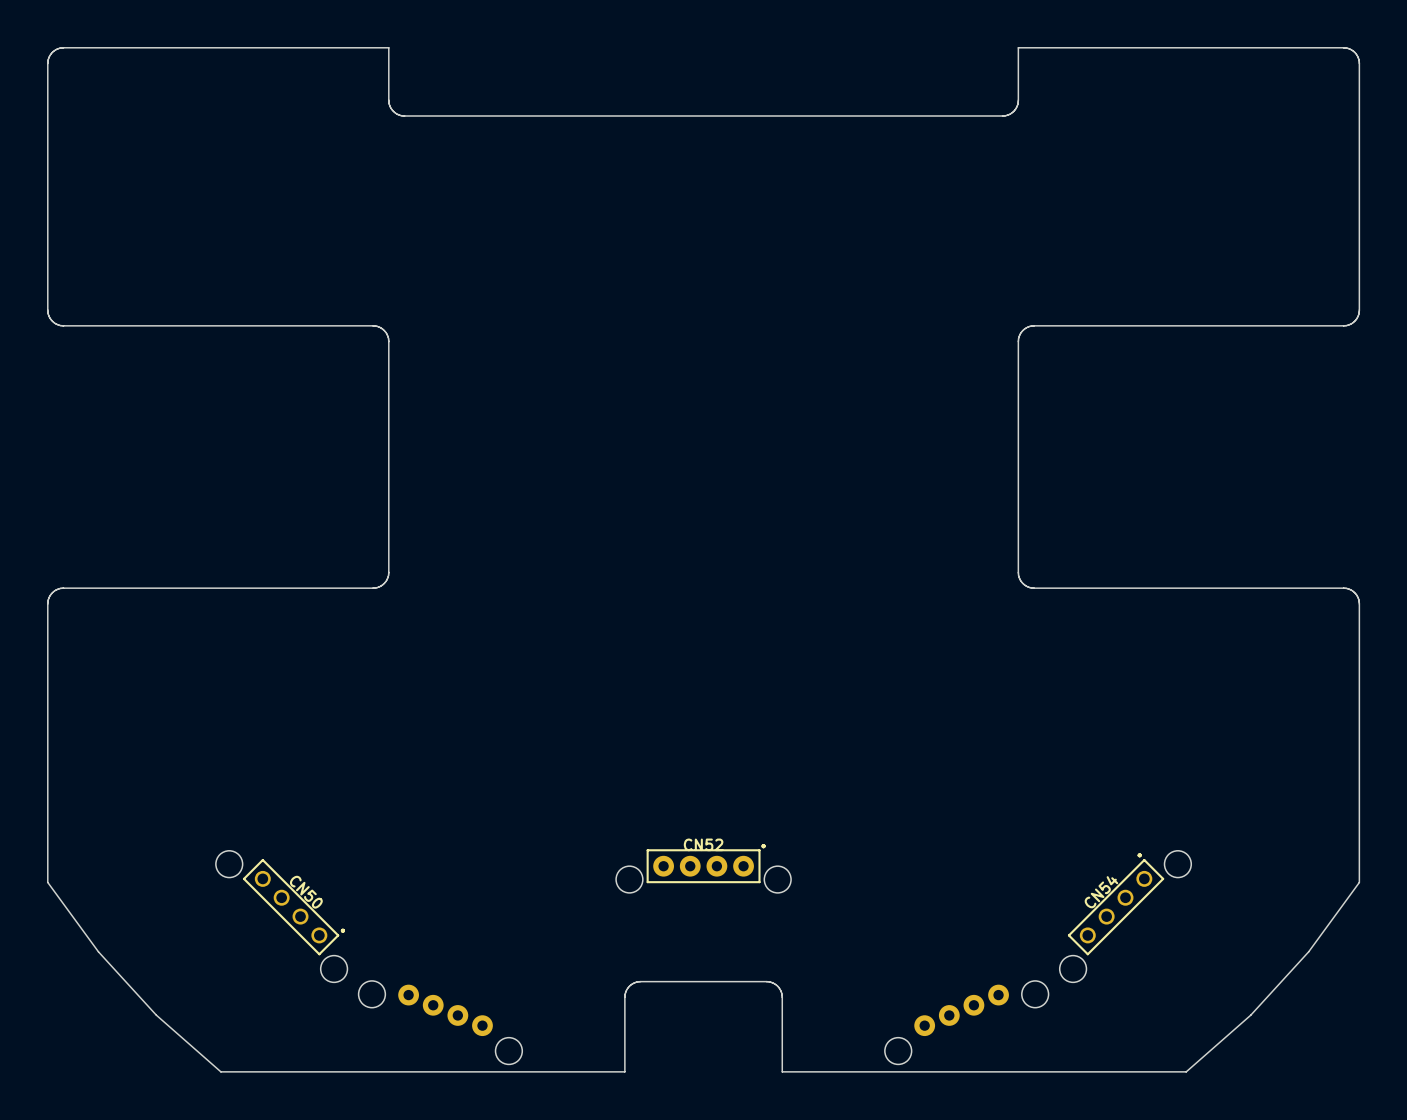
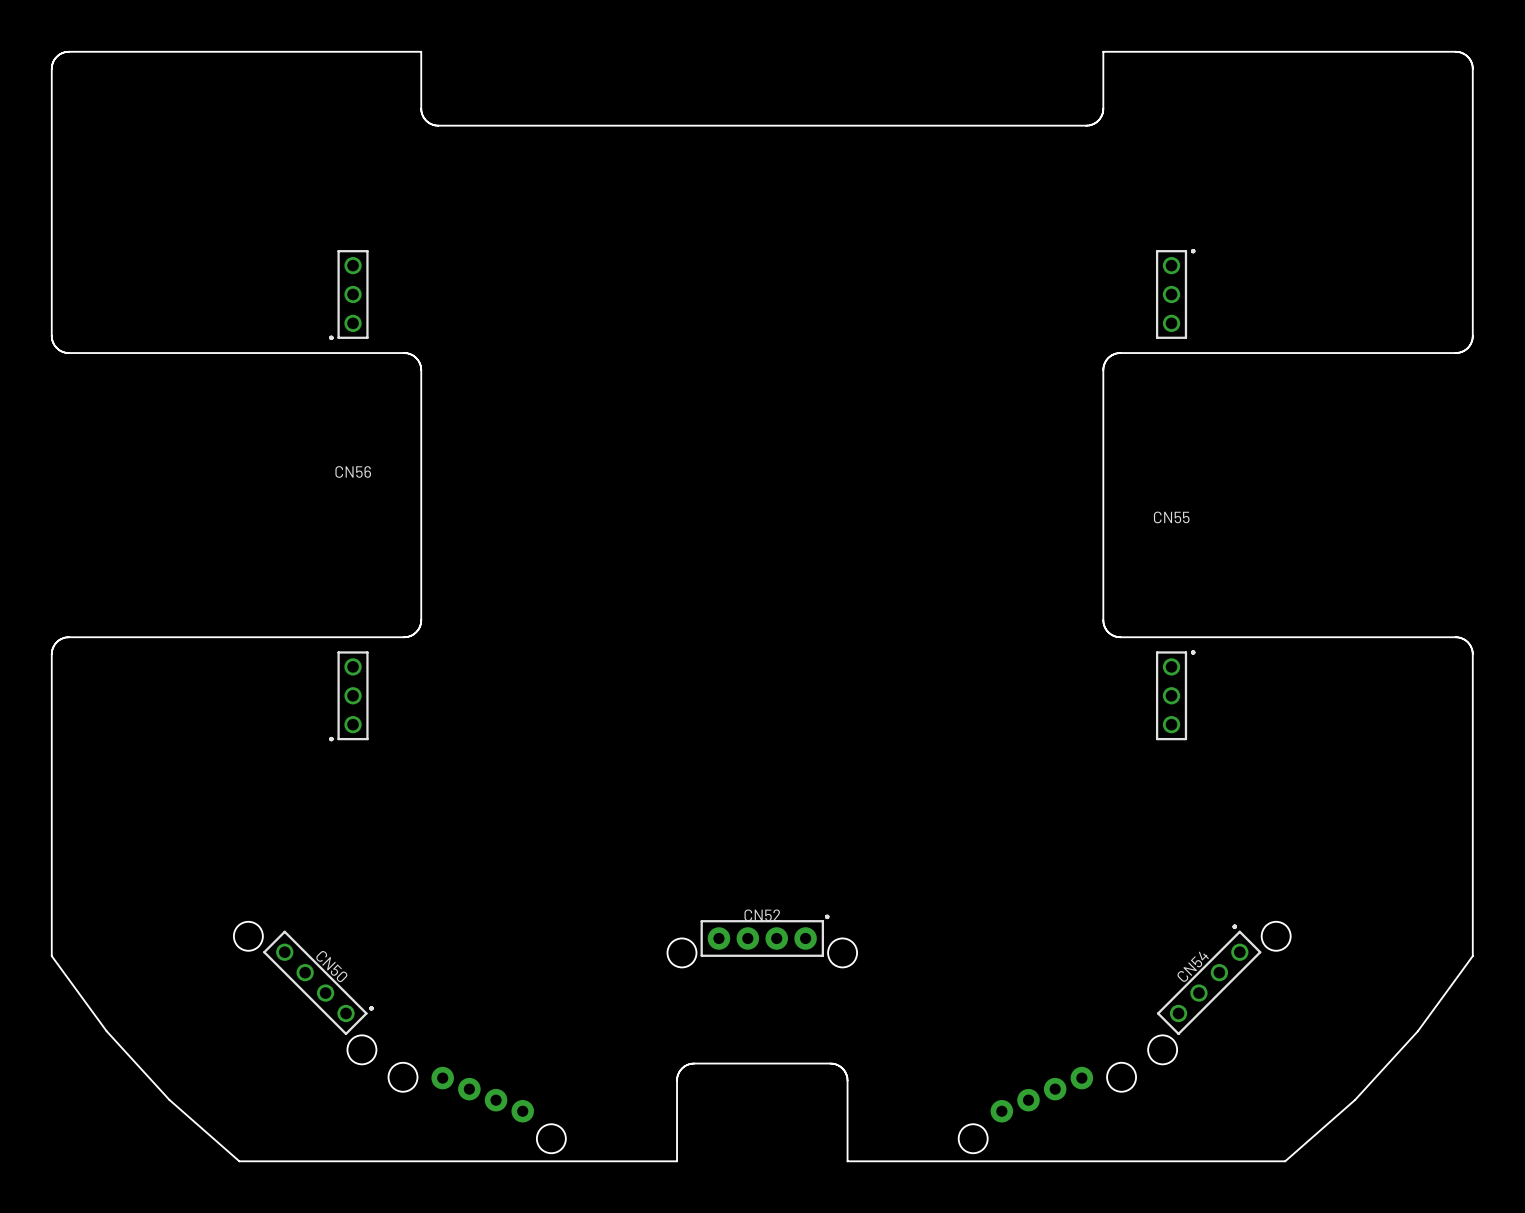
CN55: none -> (1175, 494)
CN56: none -> (348, 495)

